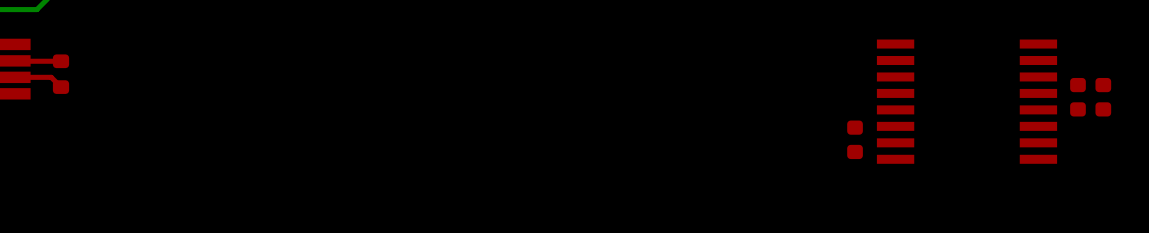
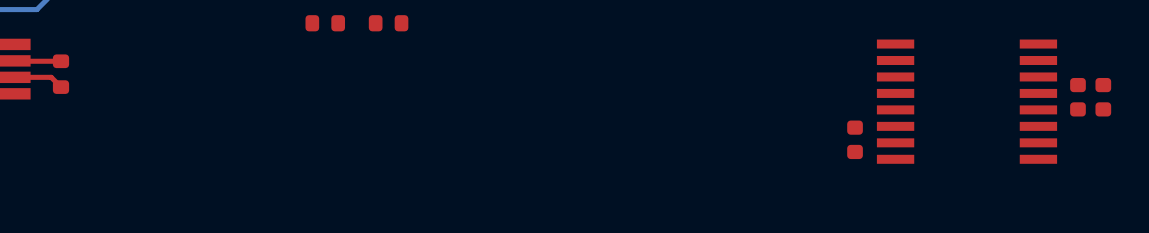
part: none -> (325, 23)
part: none -> (388, 23)

